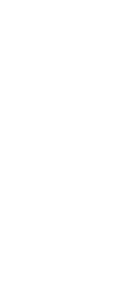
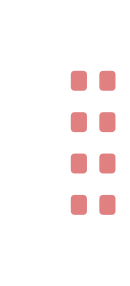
part: none -> (93, 80)
part: none -> (93, 122)
part: none -> (93, 163)
part: none -> (93, 204)

